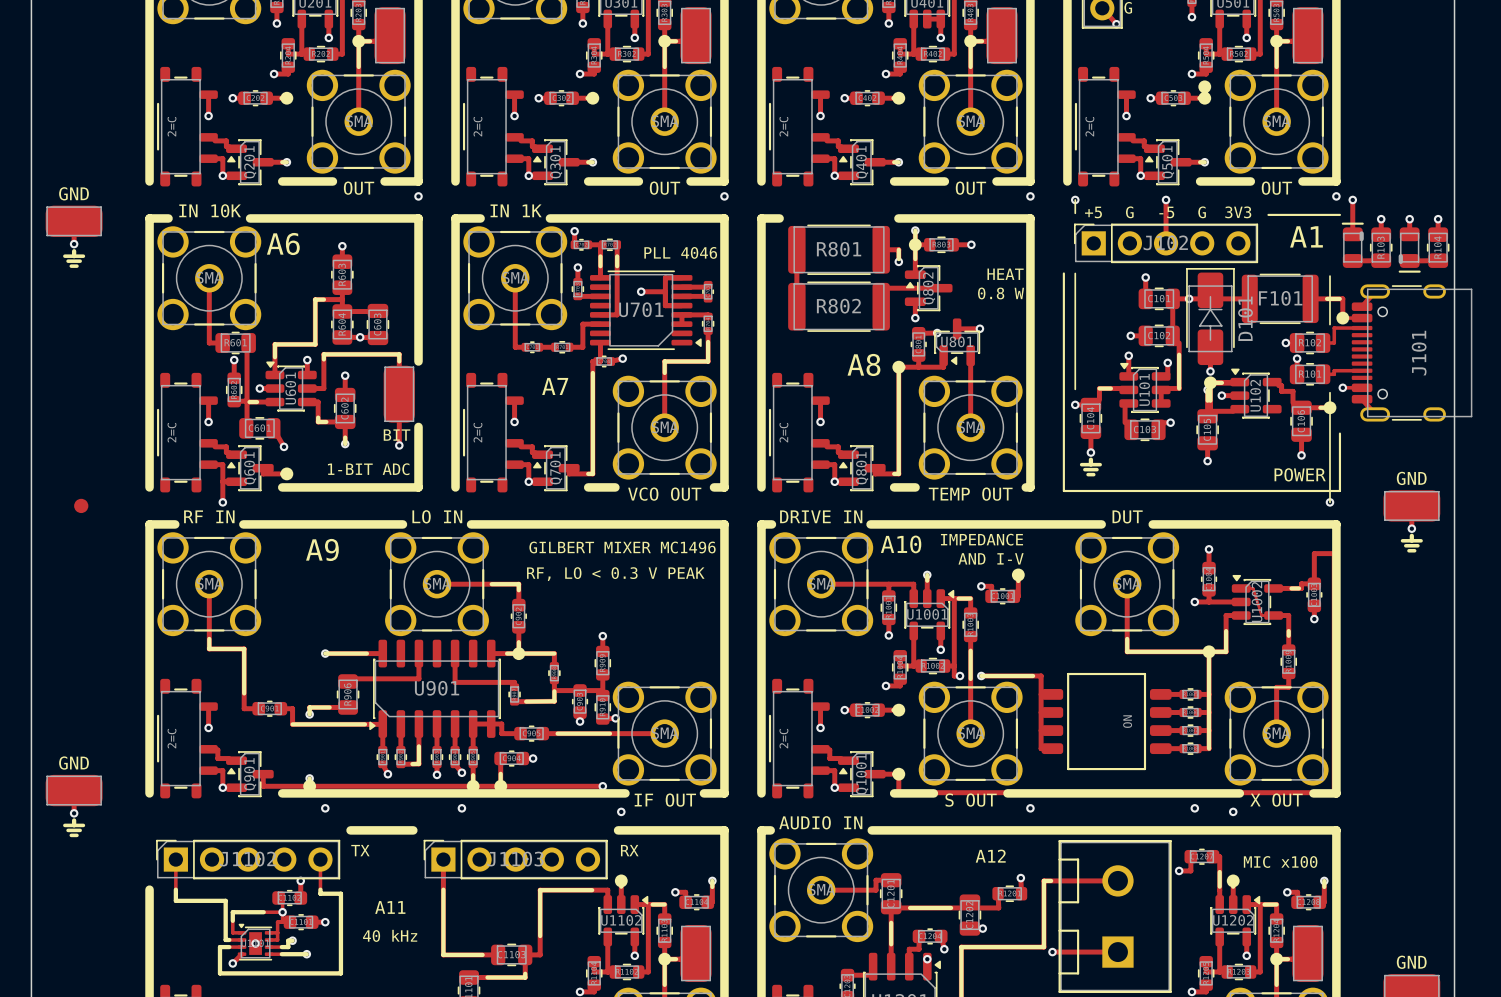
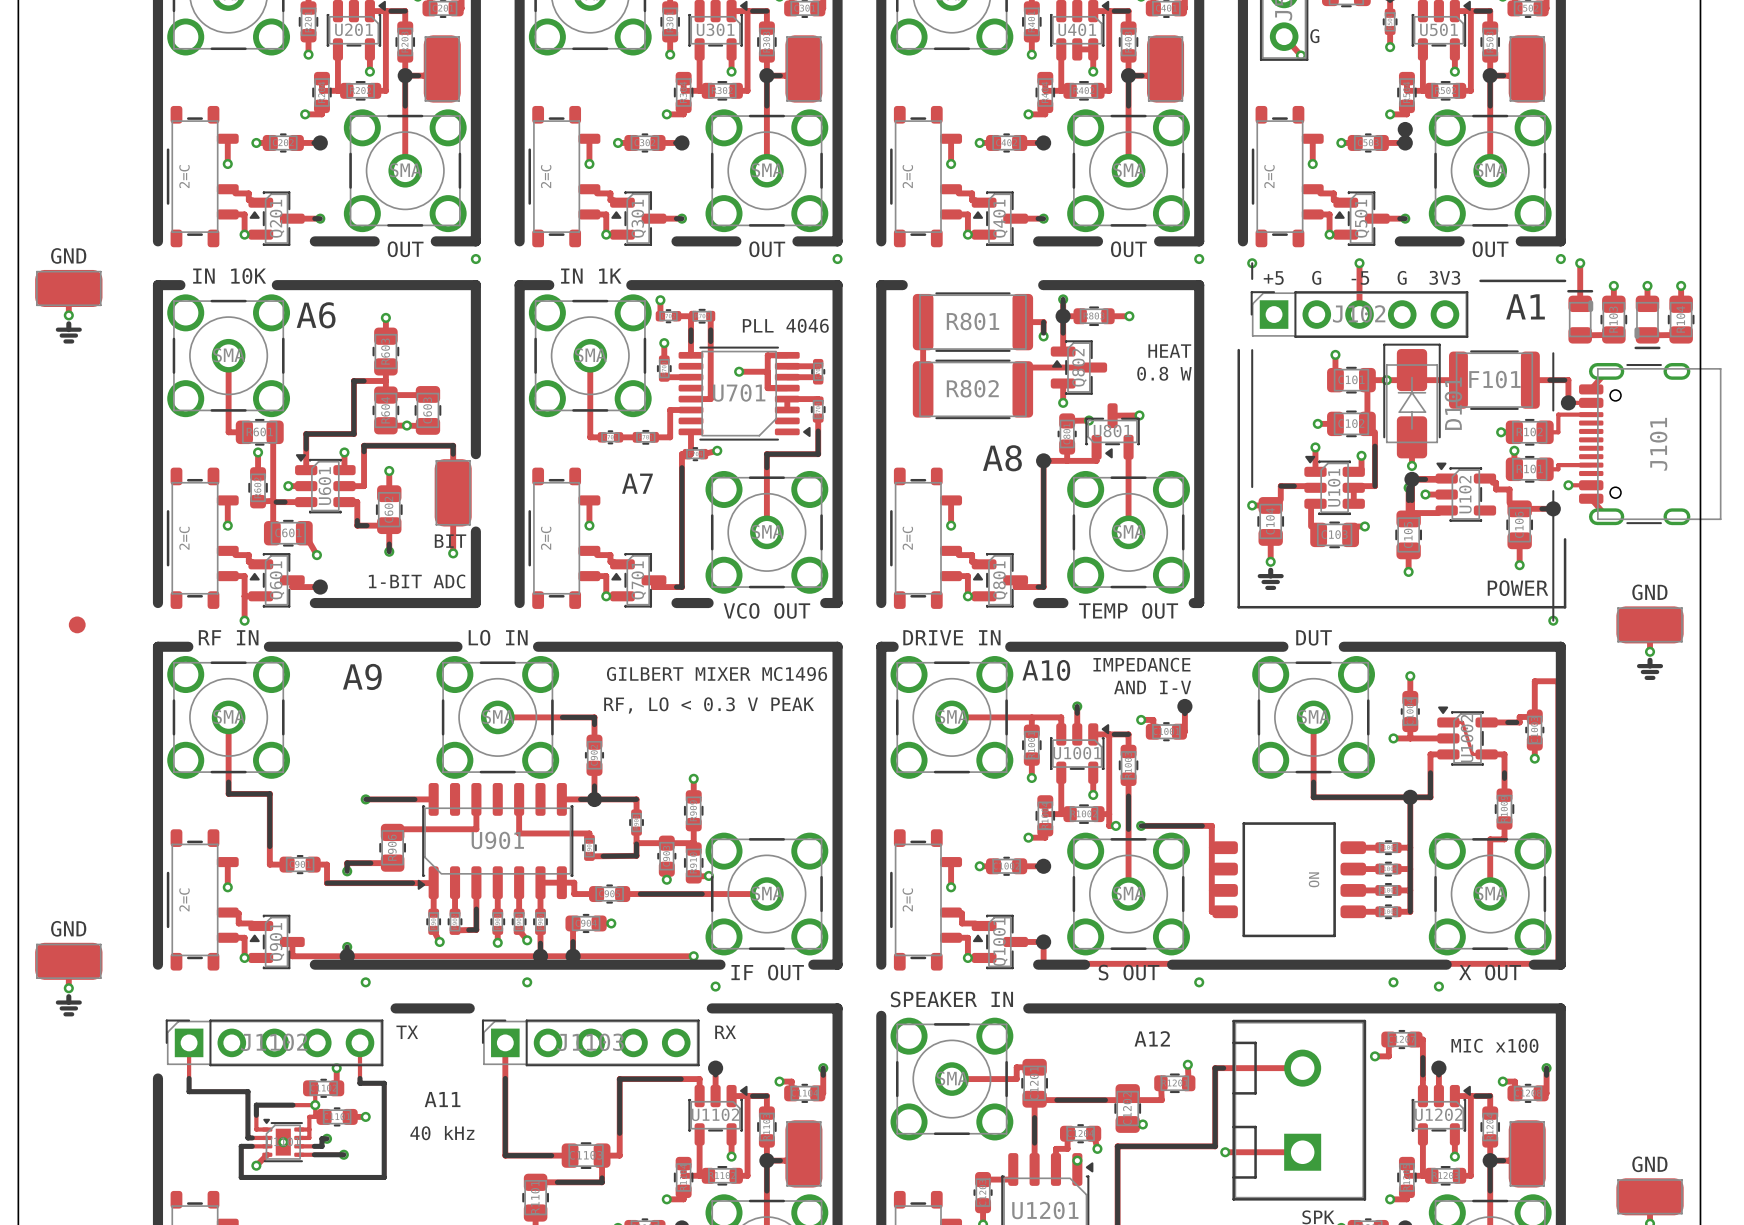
text: AUDIO IN (820, 822) -> SPEAKER IN (951, 999)
line: (770, 830) (761, 830) (761, 836) -> none
line: (871, 830) (885, 830) -> none

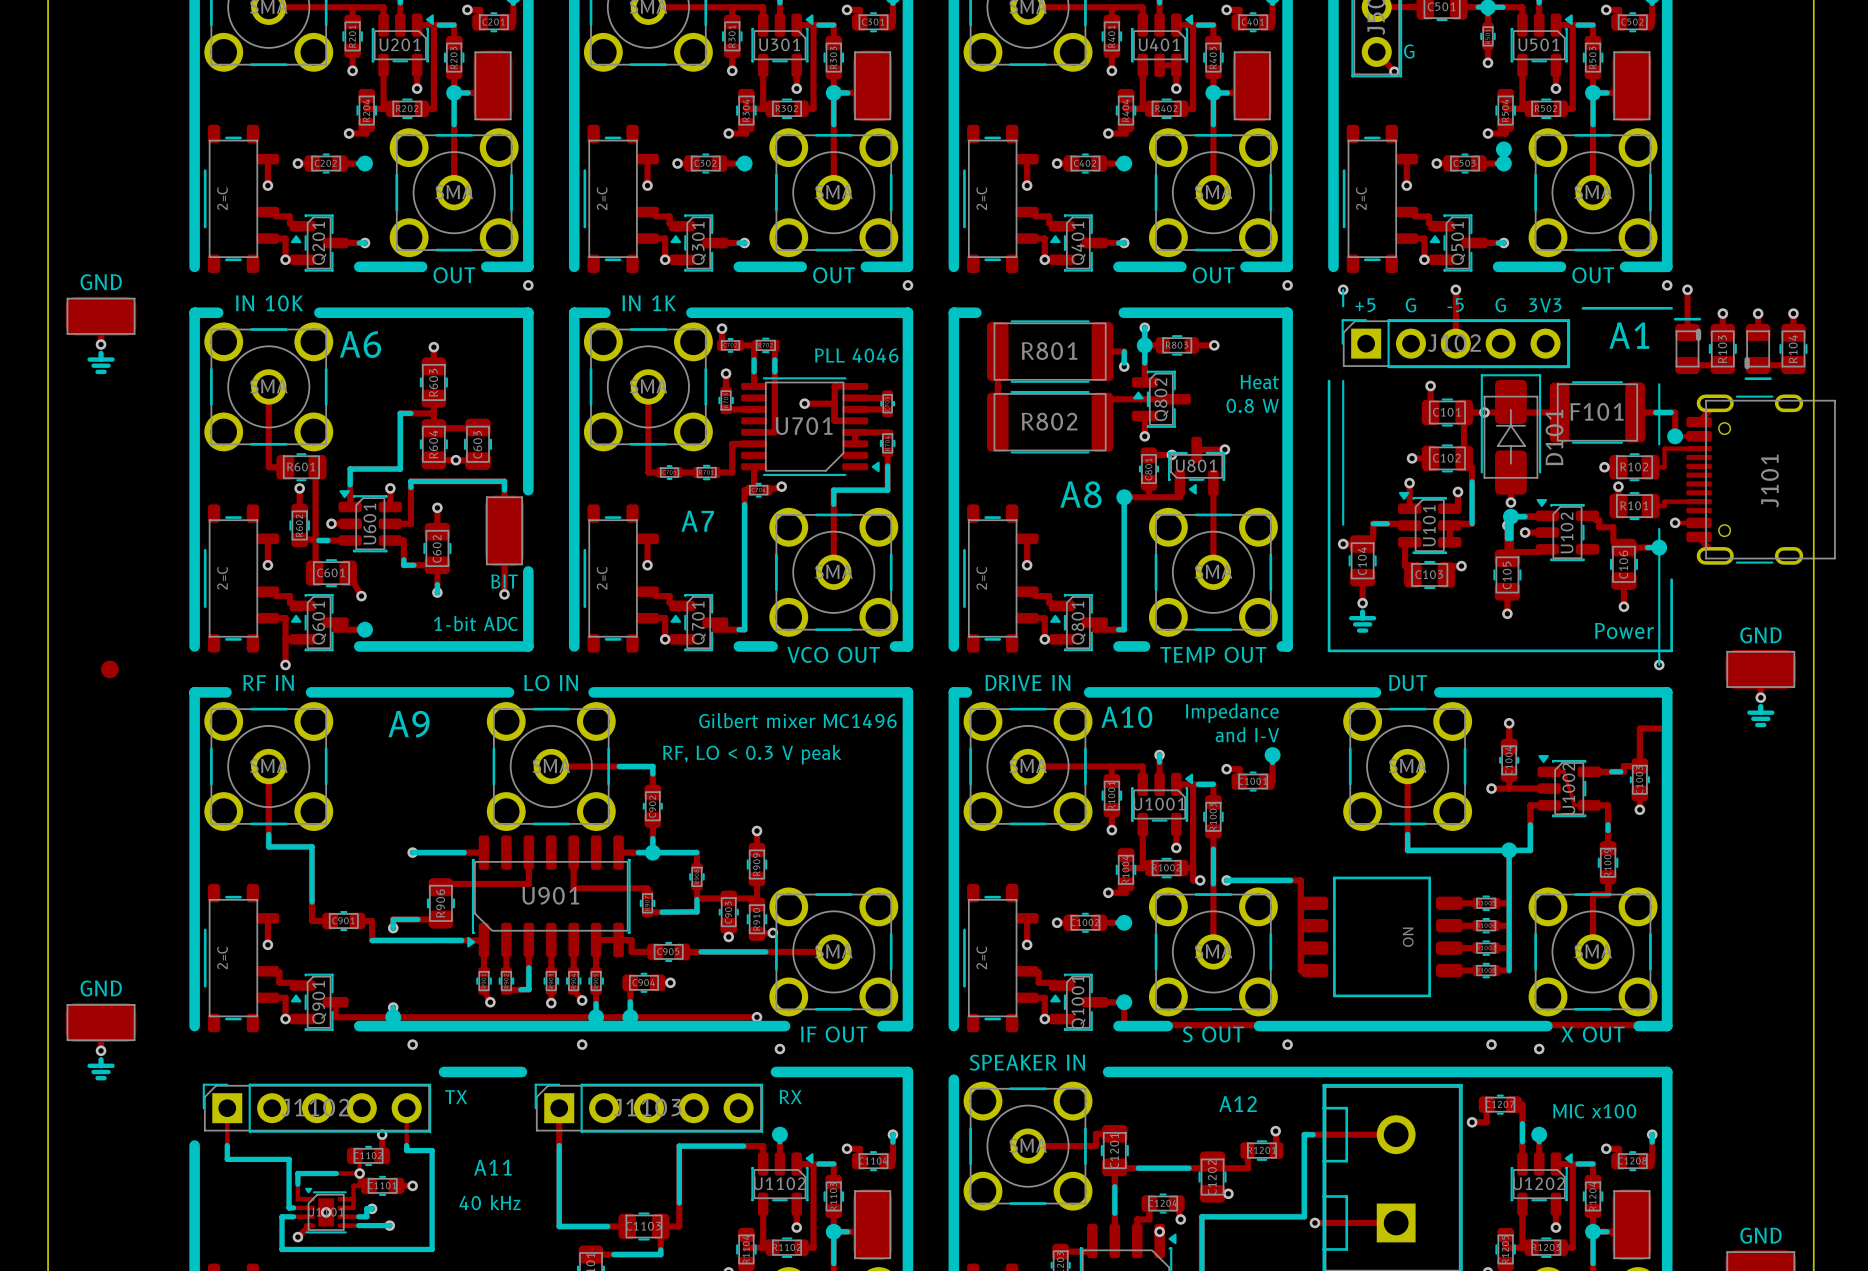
text: HEAT (1169, 351) -> Heat (1259, 382)
text: 1-BIT ADC (417, 581) -> 1-bit ADC (475, 623)
text: POWER (1517, 588) -> Power (1624, 630)
text: IMPEDANCE (1141, 664) -> Impedance (1232, 713)
text: GILBERT MIXER MC1496 (717, 674) -> Gilbert mixer MC1496 (797, 720)
text: AND I-V (1152, 687) -> and I-V (1247, 734)
text: RF, LO < 0.3 V PEAK (709, 705) -> RF, LO < 0.3 V peak (752, 754)

